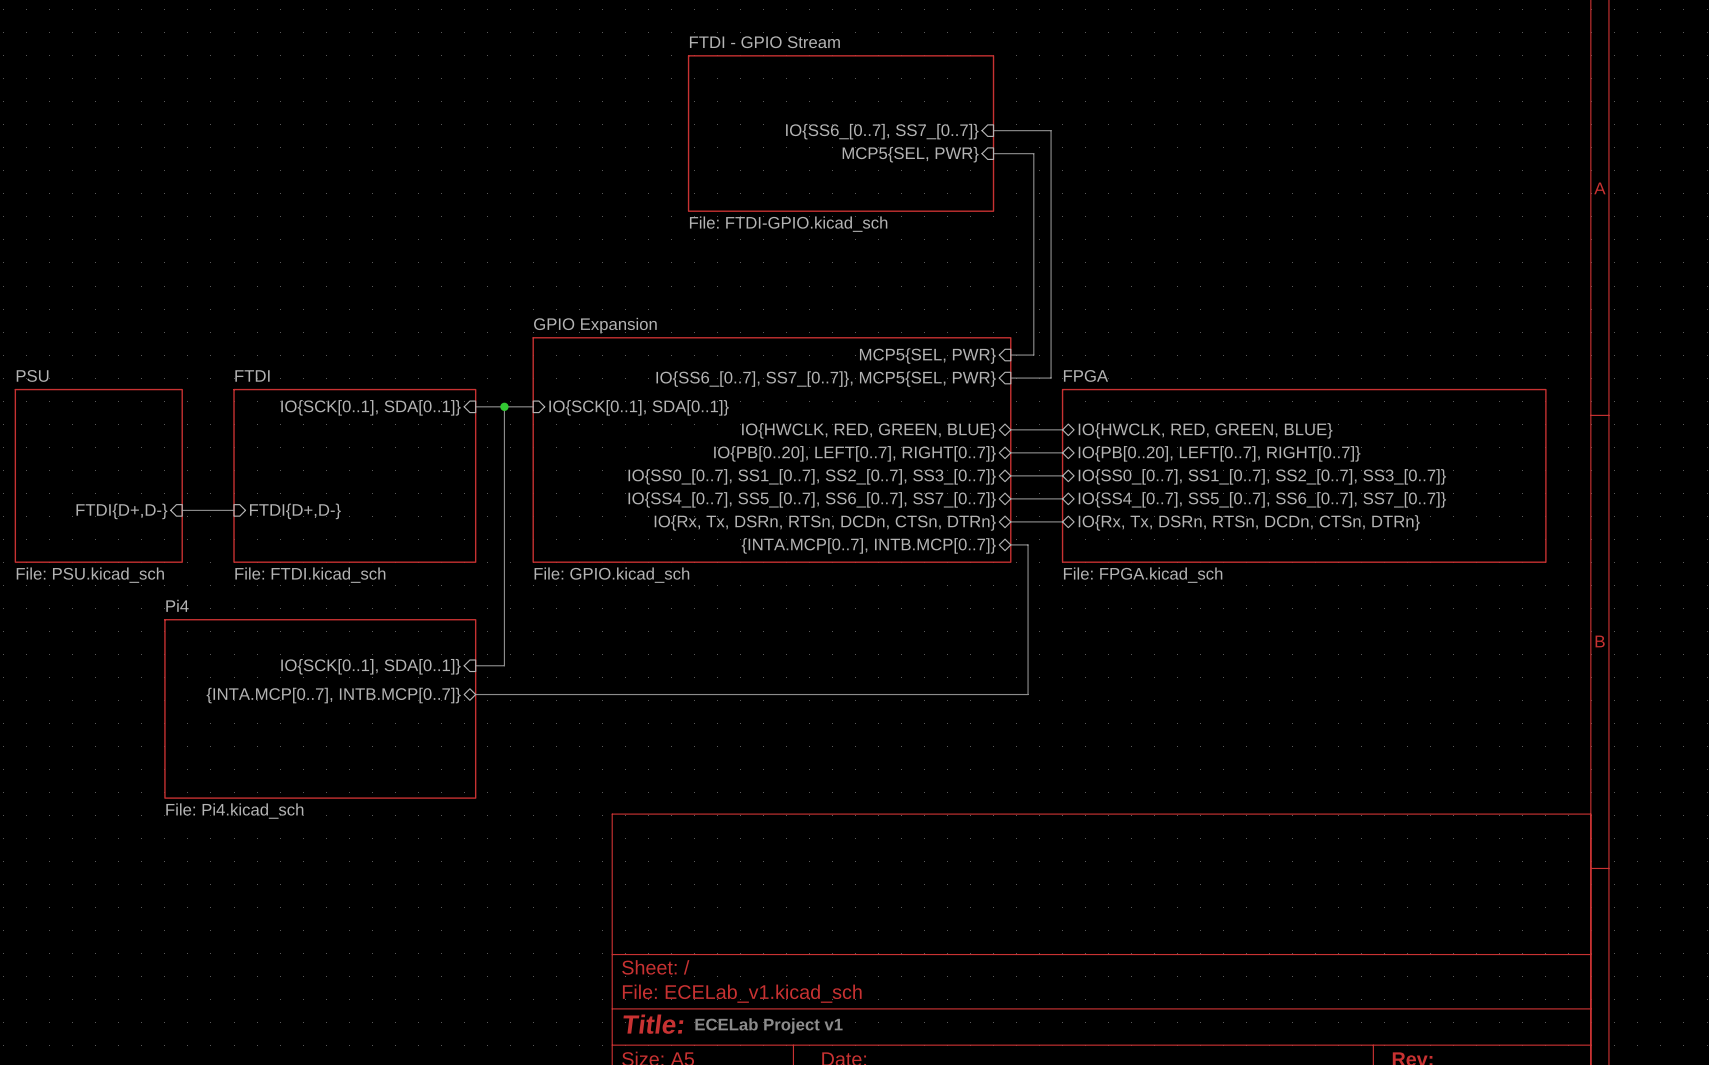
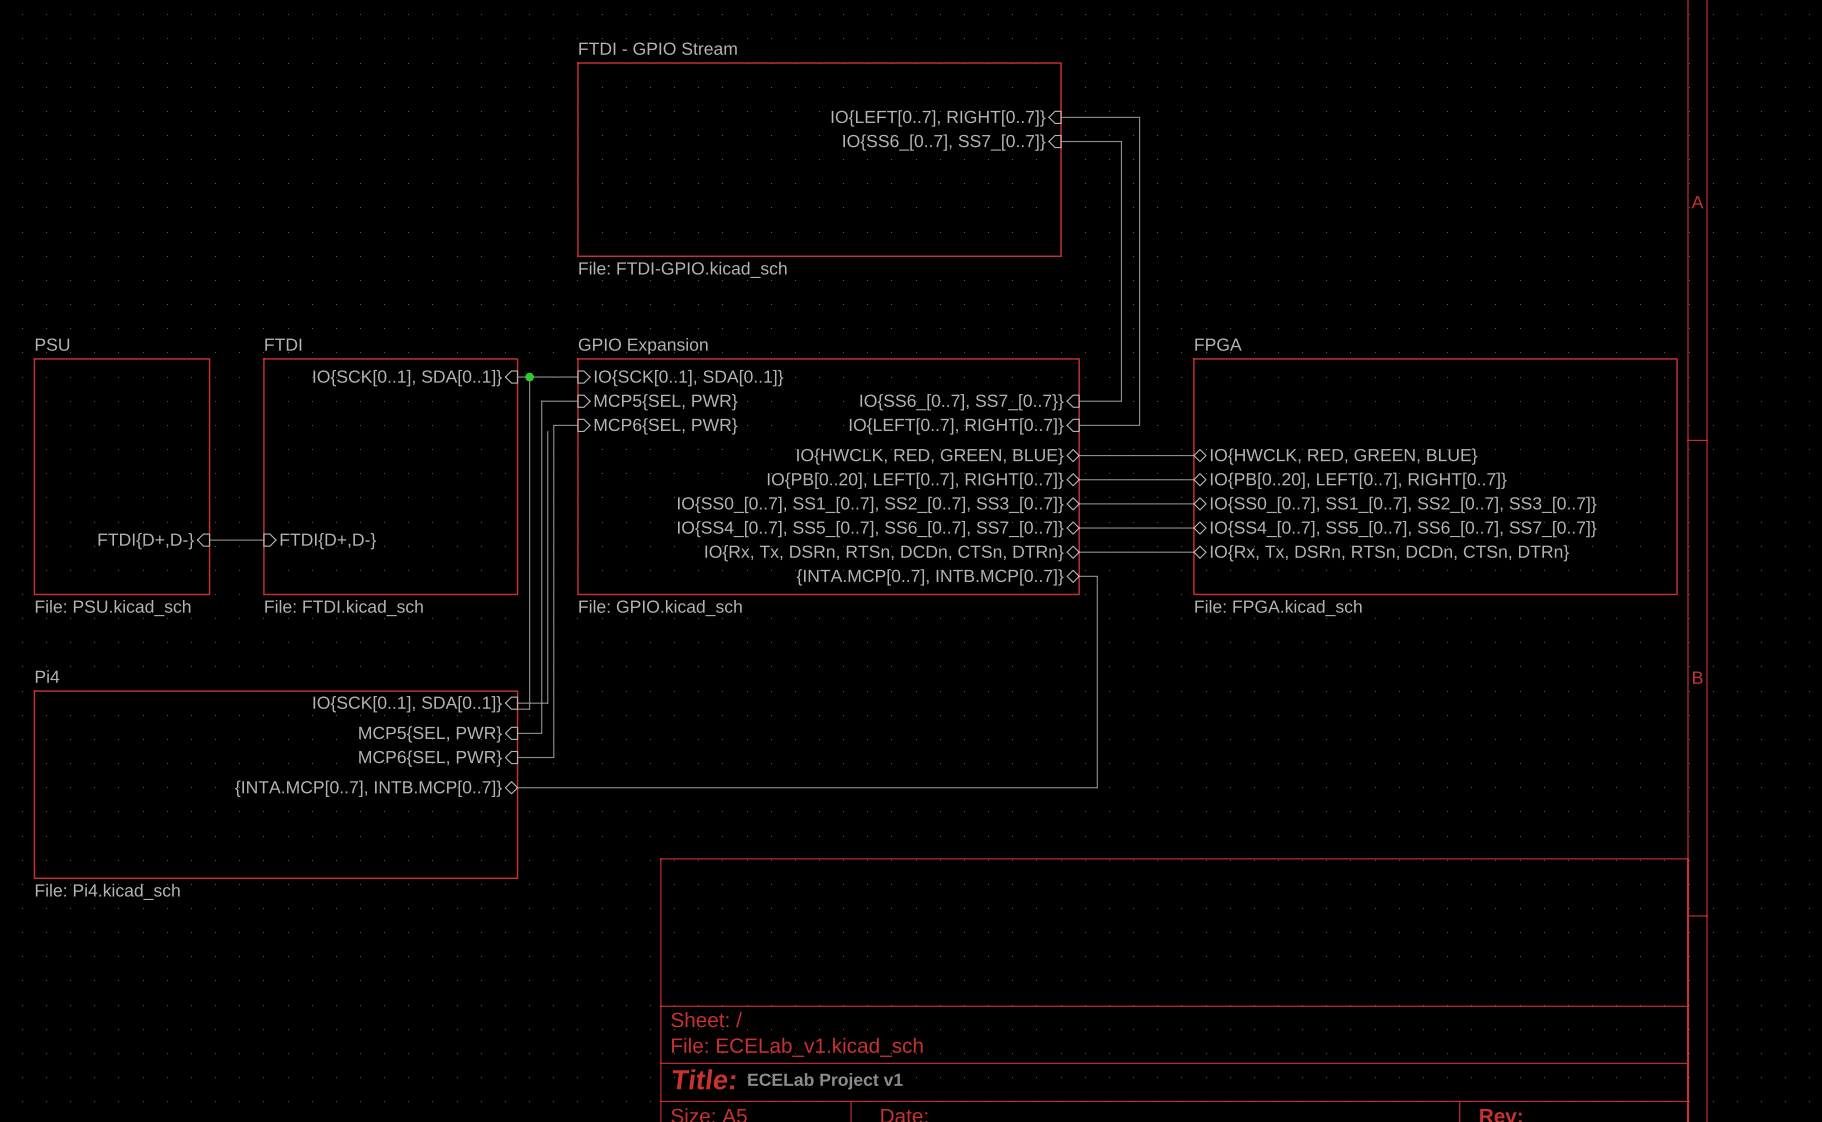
bus: none -> (1061, 117) (1139, 117) (1139, 425) (1079, 425)
sheet pin: none -> IO{LEFT[0..7], RIGHT[0..7]} (938, 118)
sheet FTDI - GPIO Stream: File: FTDI-GPIO.kicad_sch (841, 133) -> none
sheet FTDI - GPIO Stream: none -> File: FTDI-GPIO.kicad_sch (819, 159)
bus: (993, 153) (1033, 153) (1033, 355) (1010, 355) -> none
sheet pin: MCP5{SEL, PWR} (910, 154) -> none
bus: none -> (529, 377) (529, 709) (517, 709)
junction: none -> (529, 377)
sheet pin: none -> IO{SCK[0..1], SDA[0..1]} (407, 378)
sheet pin: none -> IO{SCK[0..1], SDA[0..1]} (689, 378)
sheet pin: MCP5{SEL, PWR} (927, 356) -> none
bus: none -> (577, 401) (541, 401) (541, 733)
sheet pin: none -> MCP5{SEL, PWR} (666, 402)
sheet pin: IO{SS6_[0..7], SS7_[0..7]}, MCP5{SEL, PWR} (826, 379) -> IO{SS6_[0..7], SS7_[0..7}} (962, 402)
bus: none -> (577, 425) (553, 425) (553, 757) (517, 757)
sheet pin: none -> IO{LEFT[0..7], RIGHT[0..7]} (956, 426)
bus: (475, 406) (533, 406) -> (517, 377) (577, 377)
junction: (504, 406) -> none
sheet pin: IO{SCK[0..1], SDA[0..1]} (371, 407) -> none
sheet pin: IO{SCK[0..1], SDA[0..1]} (639, 407) -> MCP6{SEL, PWR} (666, 426)
bus: none -> (1133, 455) (1193, 455)
sheet pin position: IO{HWCLK, RED, GREEN, BLUE} (1205, 430) -> IO{HWCLK, RED, GREEN, BLUE} (1344, 456)
sheet PSU: none -> File: PSU.kicad_sch (121, 476)
sheet FTDI: none -> File: FTDI.kicad_sch (390, 476)
sheet FPGA: none -> File: FPGA.kicad_sch (1435, 476)
bus: none -> (1133, 479) (1193, 479)
sheet pin position: IO{PB[0..20], LEFT[0..7], RIGHT[0..7]} (1219, 453) -> IO{PB[0..20], LEFT[0..7], RIGHT[0..7]} (1358, 480)
sheet PSU: File: PSU.kicad_sch (98, 475) -> none
sheet FTDI: File: FTDI.kicad_sch (354, 475) -> none
bus: none -> (1133, 503) (1193, 503)
sheet FPGA: File: FPGA.kicad_sch (1304, 475) -> none
sheet pin position: IO{SS0_[0..7], SS1_[0..7], SS2_[0..7], SS3_[0..7]} (1262, 476) -> IO{SS0_[0..7], SS1_[0..7], SS2_[0..7], SS3_[0..7]} (1403, 504)
bus: none -> (1133, 528) (1193, 528)
sheet pin position: IO{SS4_[0..7], SS5_[0..7], SS6_[0..7], SS7_[0..7]} (1262, 499) -> IO{SS4_[0..7], SS5_[0..7], SS6_[0..7], SS7_[0..7]} (1403, 529)
bus: none -> (1133, 552) (1193, 552)
sheet pin position: IO{Rx, Tx, DSRn, RTSn, DCDn, CTSn, DTRn} (1249, 522) -> IO{Rx, Tx, DSRn, RTSn, DCDn, CTSn, DTRn} (1389, 553)
sheet Pi4 name position: Pi4 (177, 605) -> Pi4 (47, 676)
sheet Pi4 shape: [164, 619, 477, 799] -> [33, 690, 519, 880]
bus: (498, 694) (1028, 694) -> (517, 787) (1097, 787) (1097, 733)
sheet pin shape: bidirectional (333, 695) -> input (430, 734)
sheet pin: {INTA.MCP[0..7], INTB.MCP[0..7]} (333, 695) -> MCP5{SEL, PWR} (430, 734)
sheet pin: none -> MCP6{SEL, PWR} (430, 758)
sheet pin: none -> {INTA.MCP[0..7], INTB.MCP[0..7]} (368, 788)
sheet Pi4 value position: File: Pi4.kicad_sch (234, 811) -> File: Pi4.kicad_sch (107, 891)

